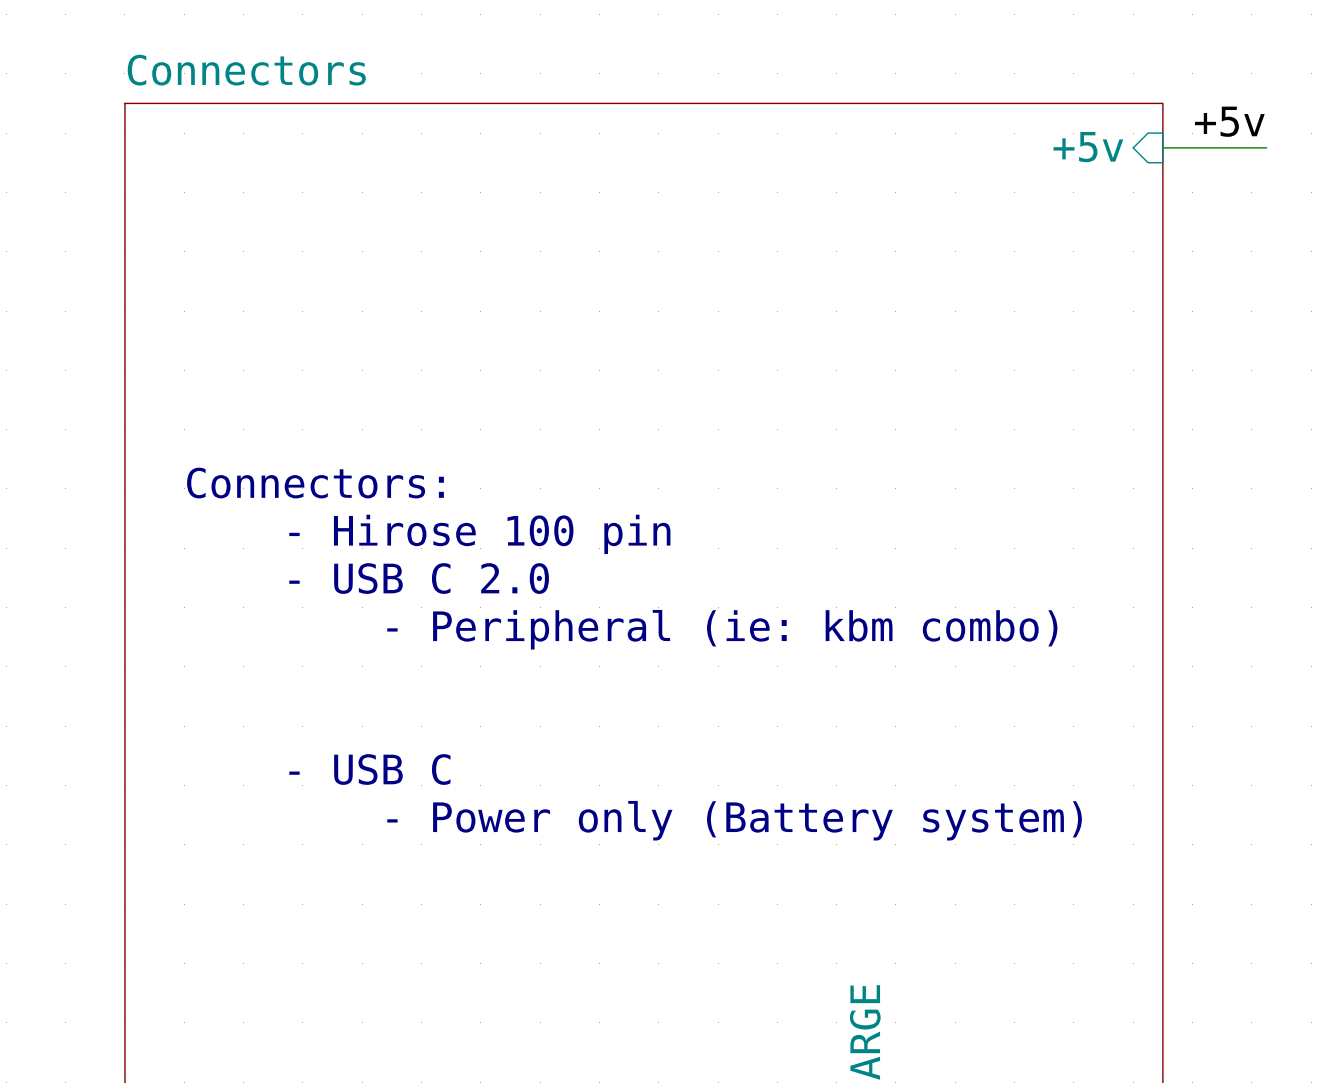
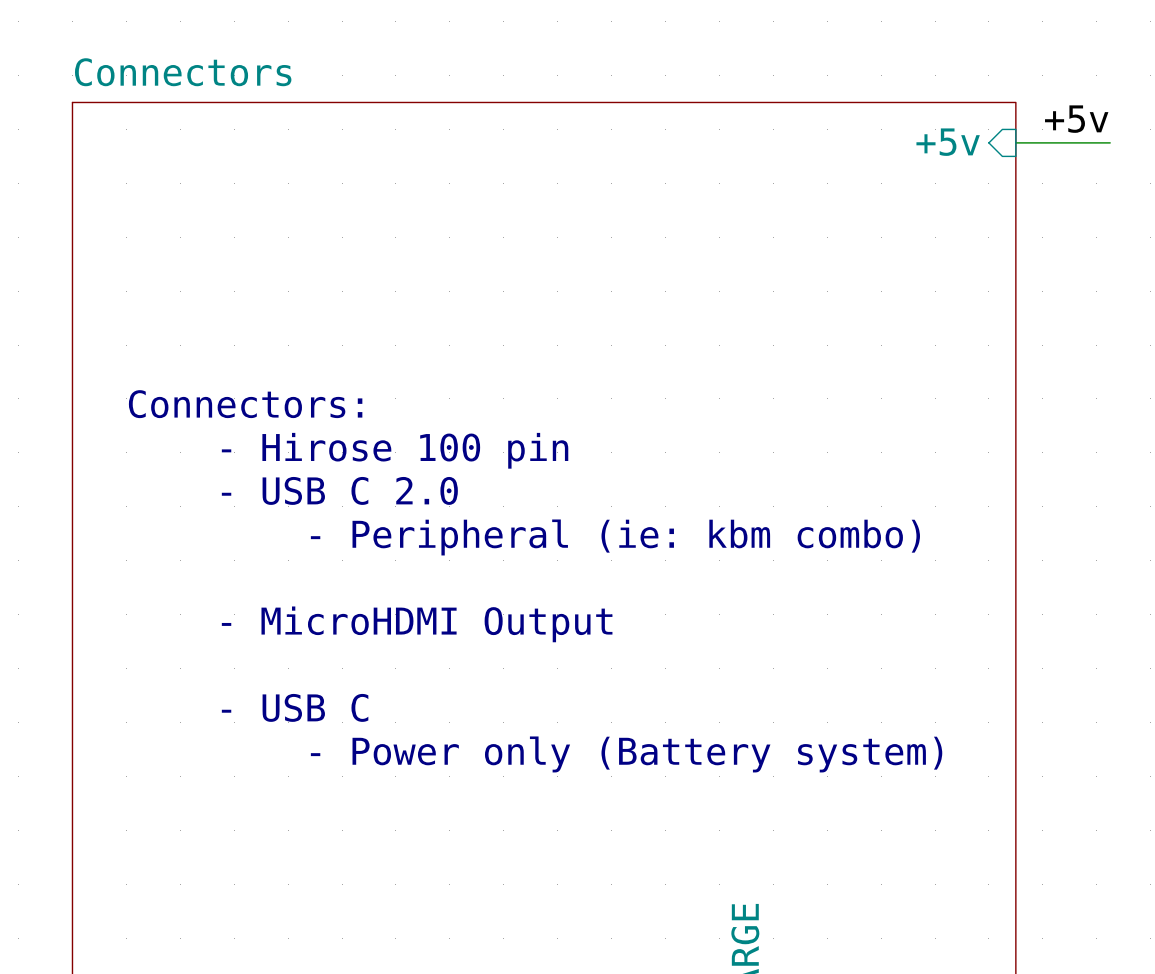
text: none -> Connectors: (245, 404)
text: Connectors: (315, 483) -> - Hirose 100 pin (395, 450)
text: - Hirose 100 pin (479, 534) -> - USB C 2.0 (339, 490)
text: - USB C 2.0 (419, 578) -> - Peripheral (ie: kbm combo) (615, 537)
text: - Peripheral (ie: kbm combo) (722, 629) -> none
text: none -> - MicroHDMI Output (417, 624)

